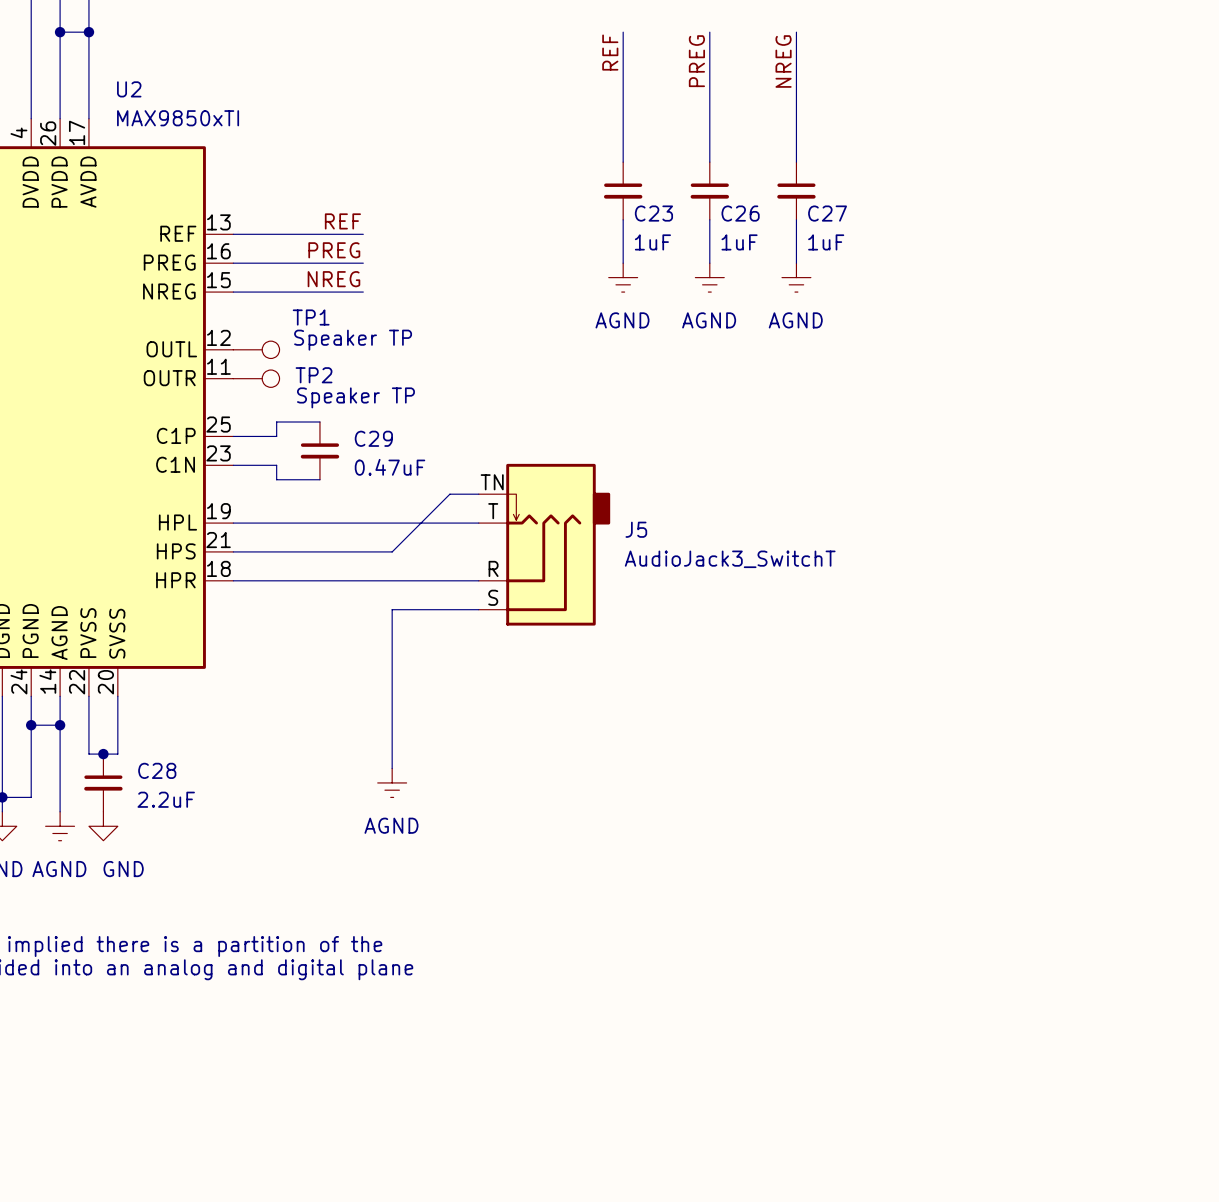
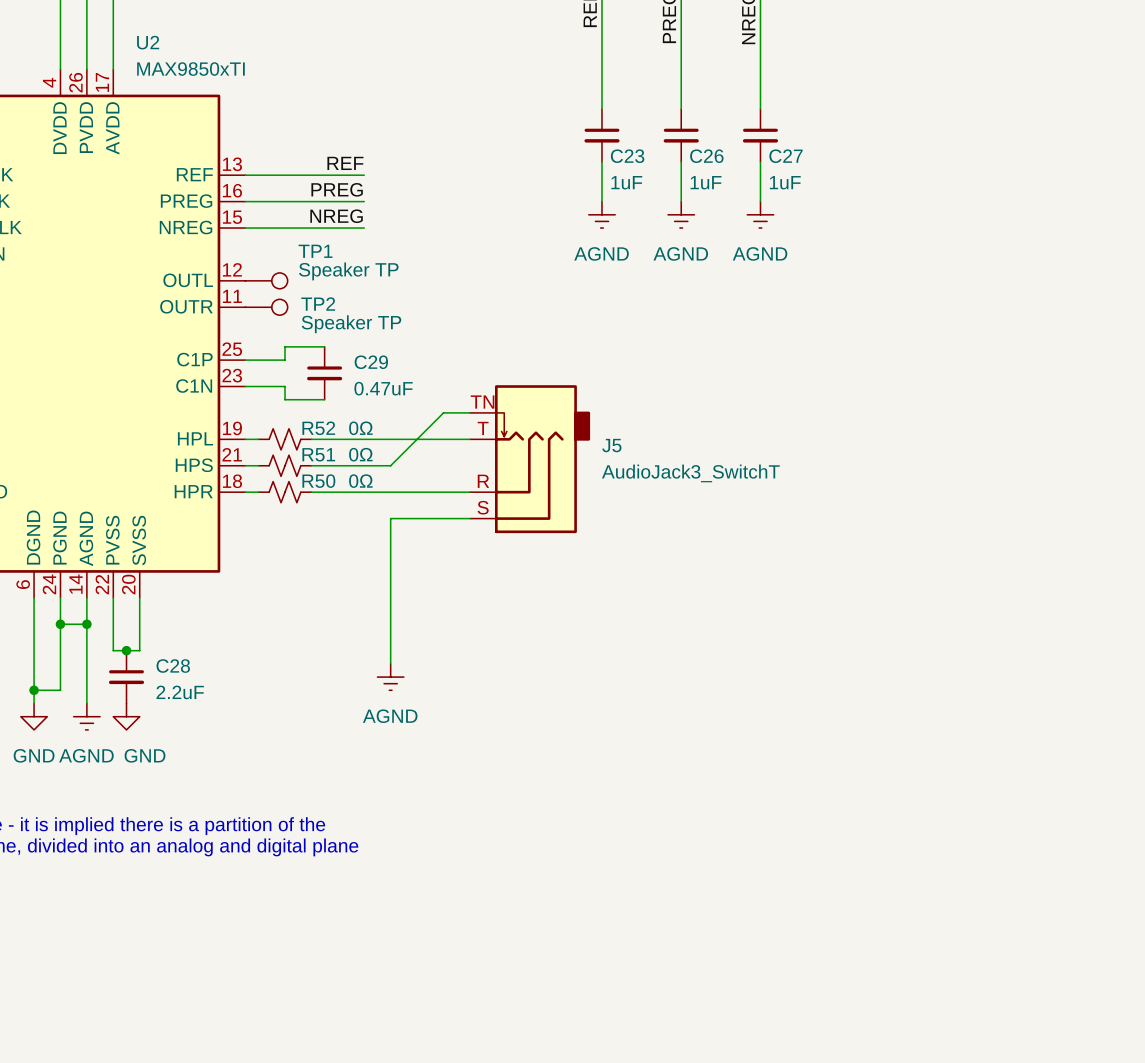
R52: none -> 0Ω (285, 439)
R51: none -> 0Ω (285, 465)
R50: none -> 0Ω (285, 492)

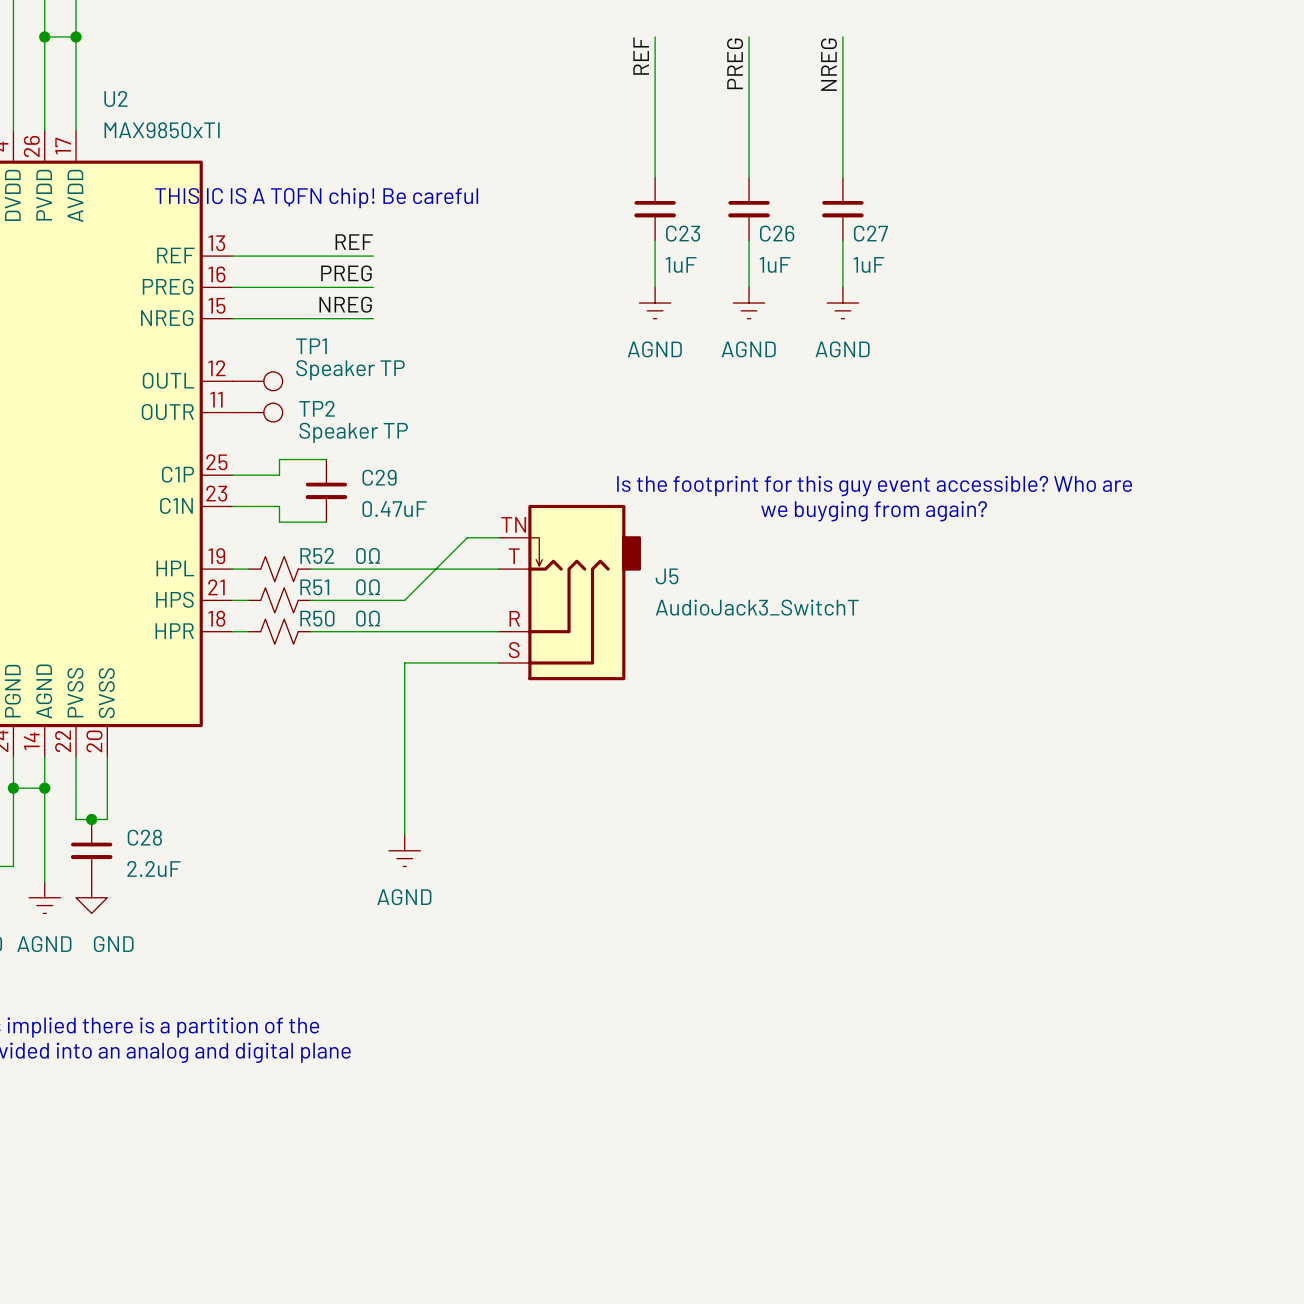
text: none -> THIS IC IS A TQFN chip! Be careful (316, 198)
text: none -> Is the footprint for this guy event accessible? Who are (874, 486)
text: none -> we buyging from again? (874, 511)

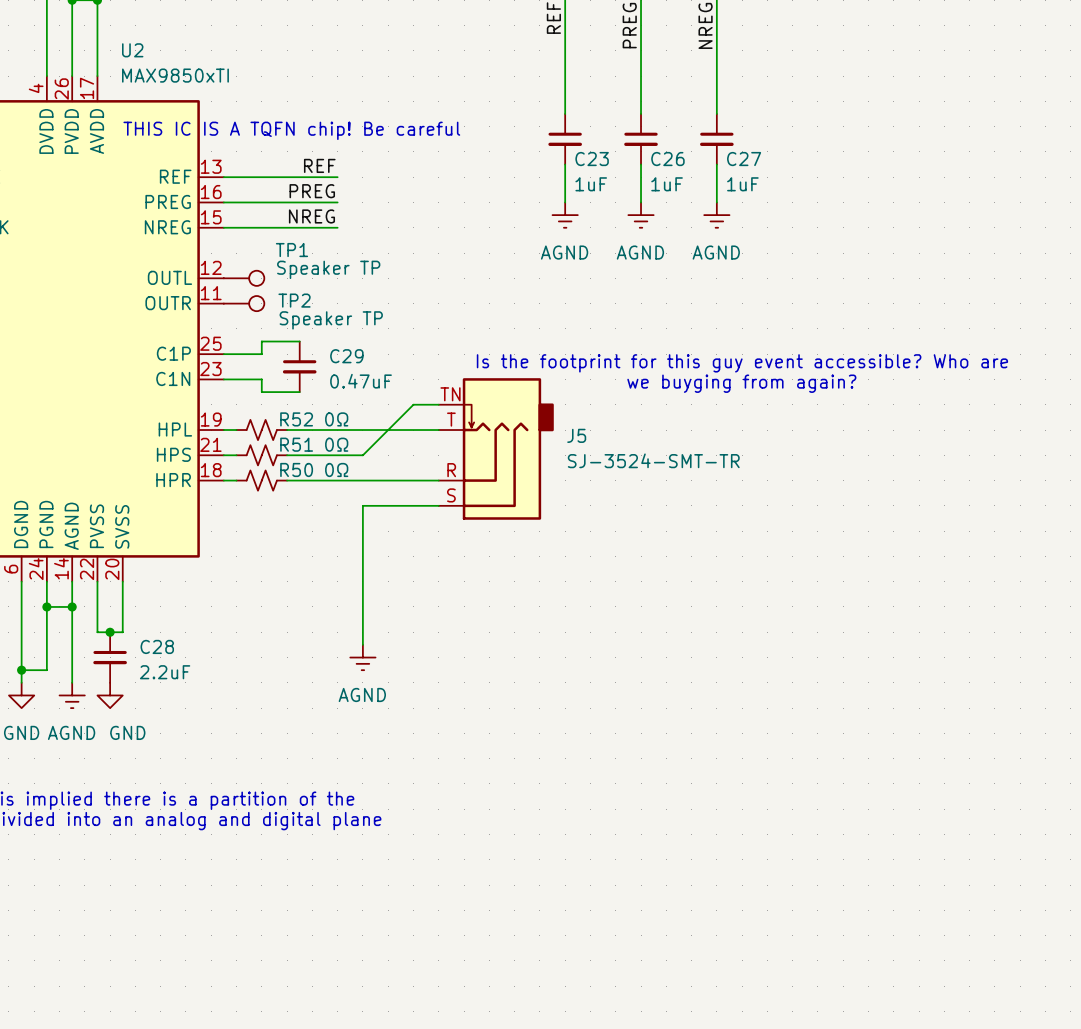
J5 value: AudioJack3_SwitchT (757, 607) -> SJ-3524-SMT-TR (653, 460)

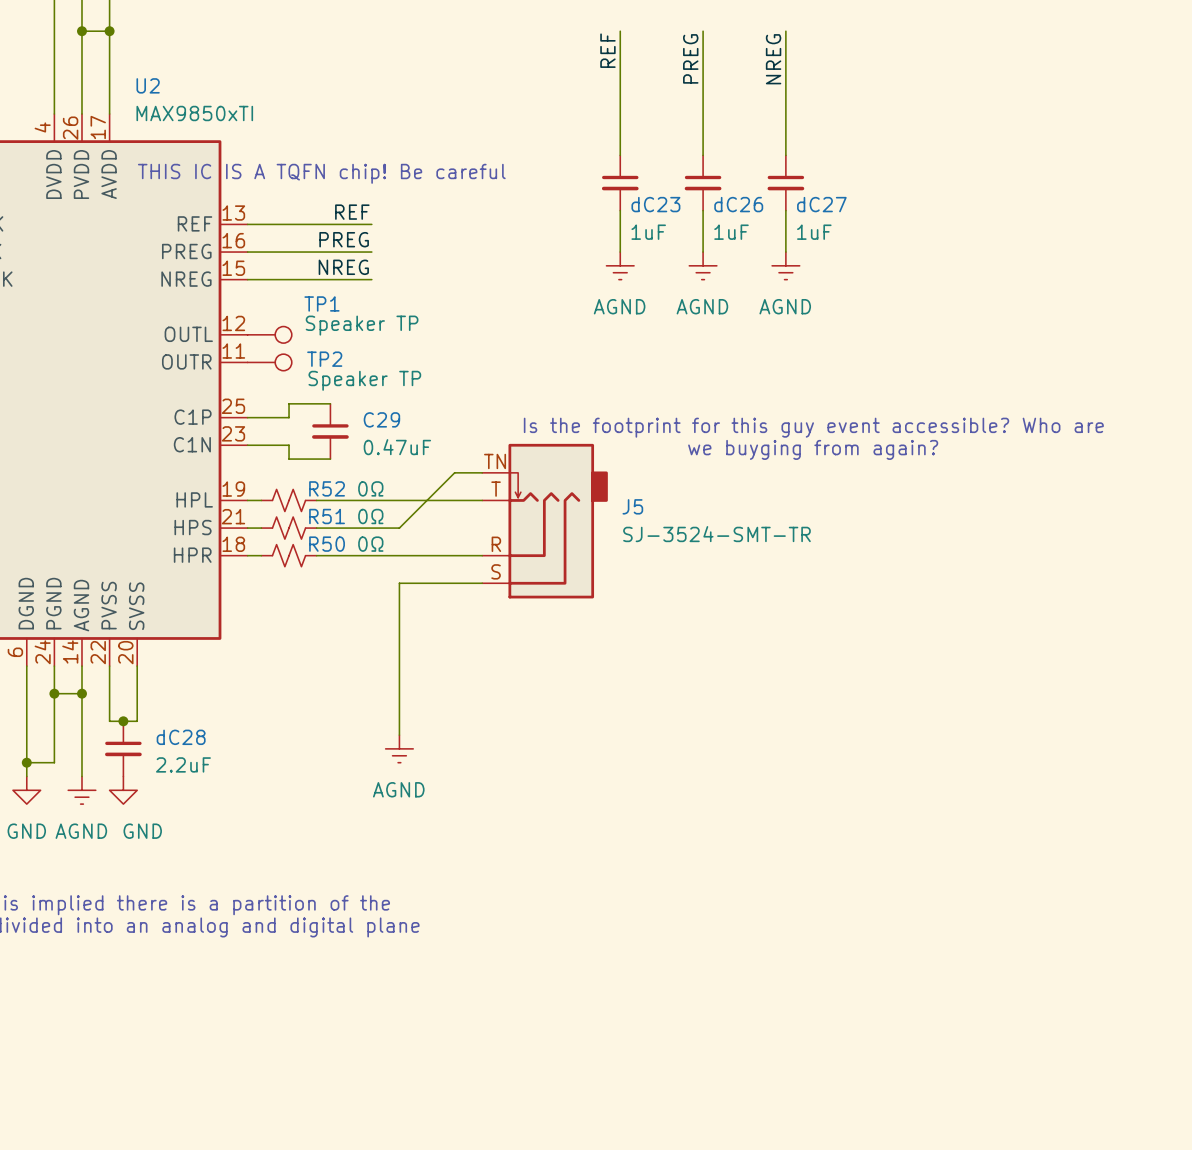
C23 name: C23 (592, 159) -> dC23 (655, 204)
C26 name: C26 (667, 159) -> dC26 (738, 204)
C27 name: C27 (744, 159) -> dC27 (821, 204)
C28 name: C28 (157, 646) -> dC28 (181, 737)

